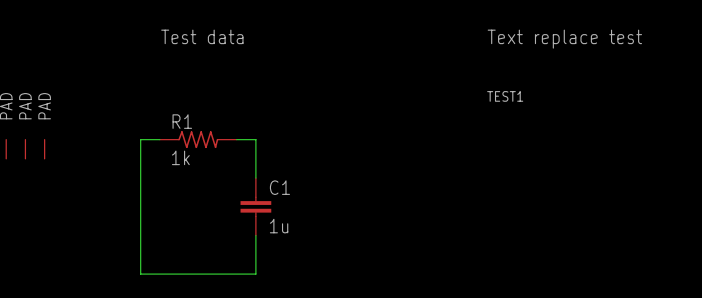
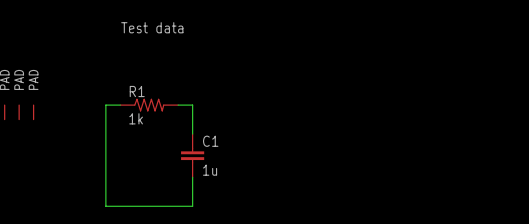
text: Text replace test (564, 39) -> none
TEST1: (505, 96) -> none

